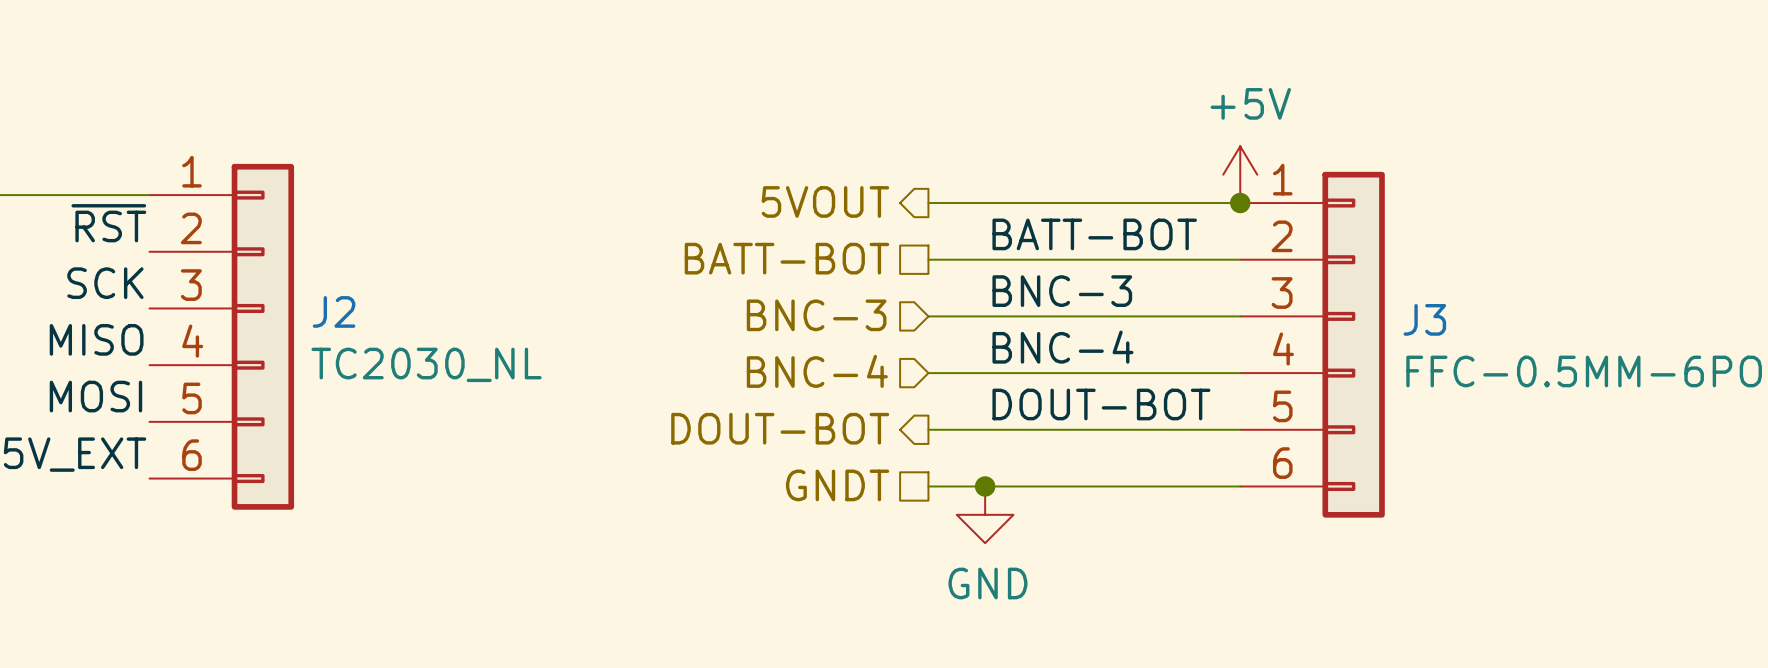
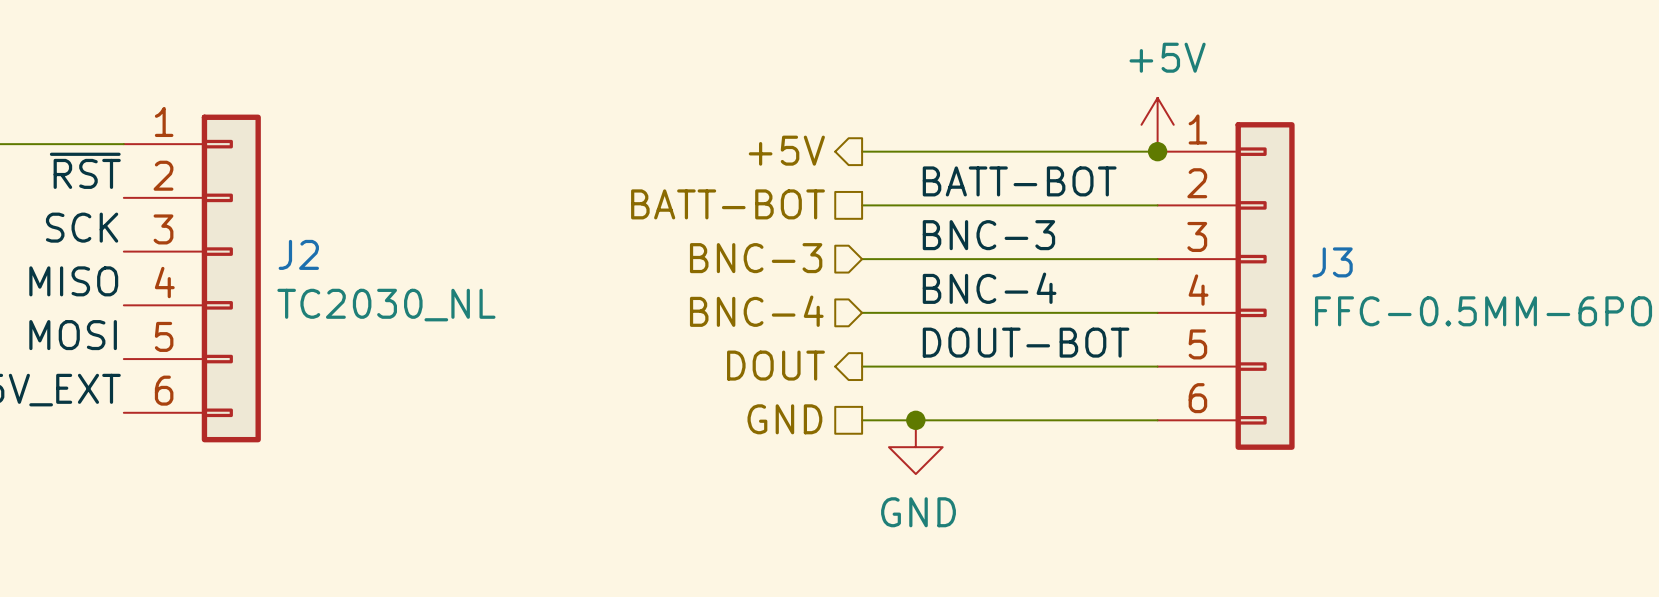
hierarchical label: 5VOUT (825, 201) -> +5V (786, 150)
hierarchical label: DOUT-BOT (780, 428) -> DOUT (775, 365)
hierarchical label: GNDT (837, 485) -> GND (784, 419)

